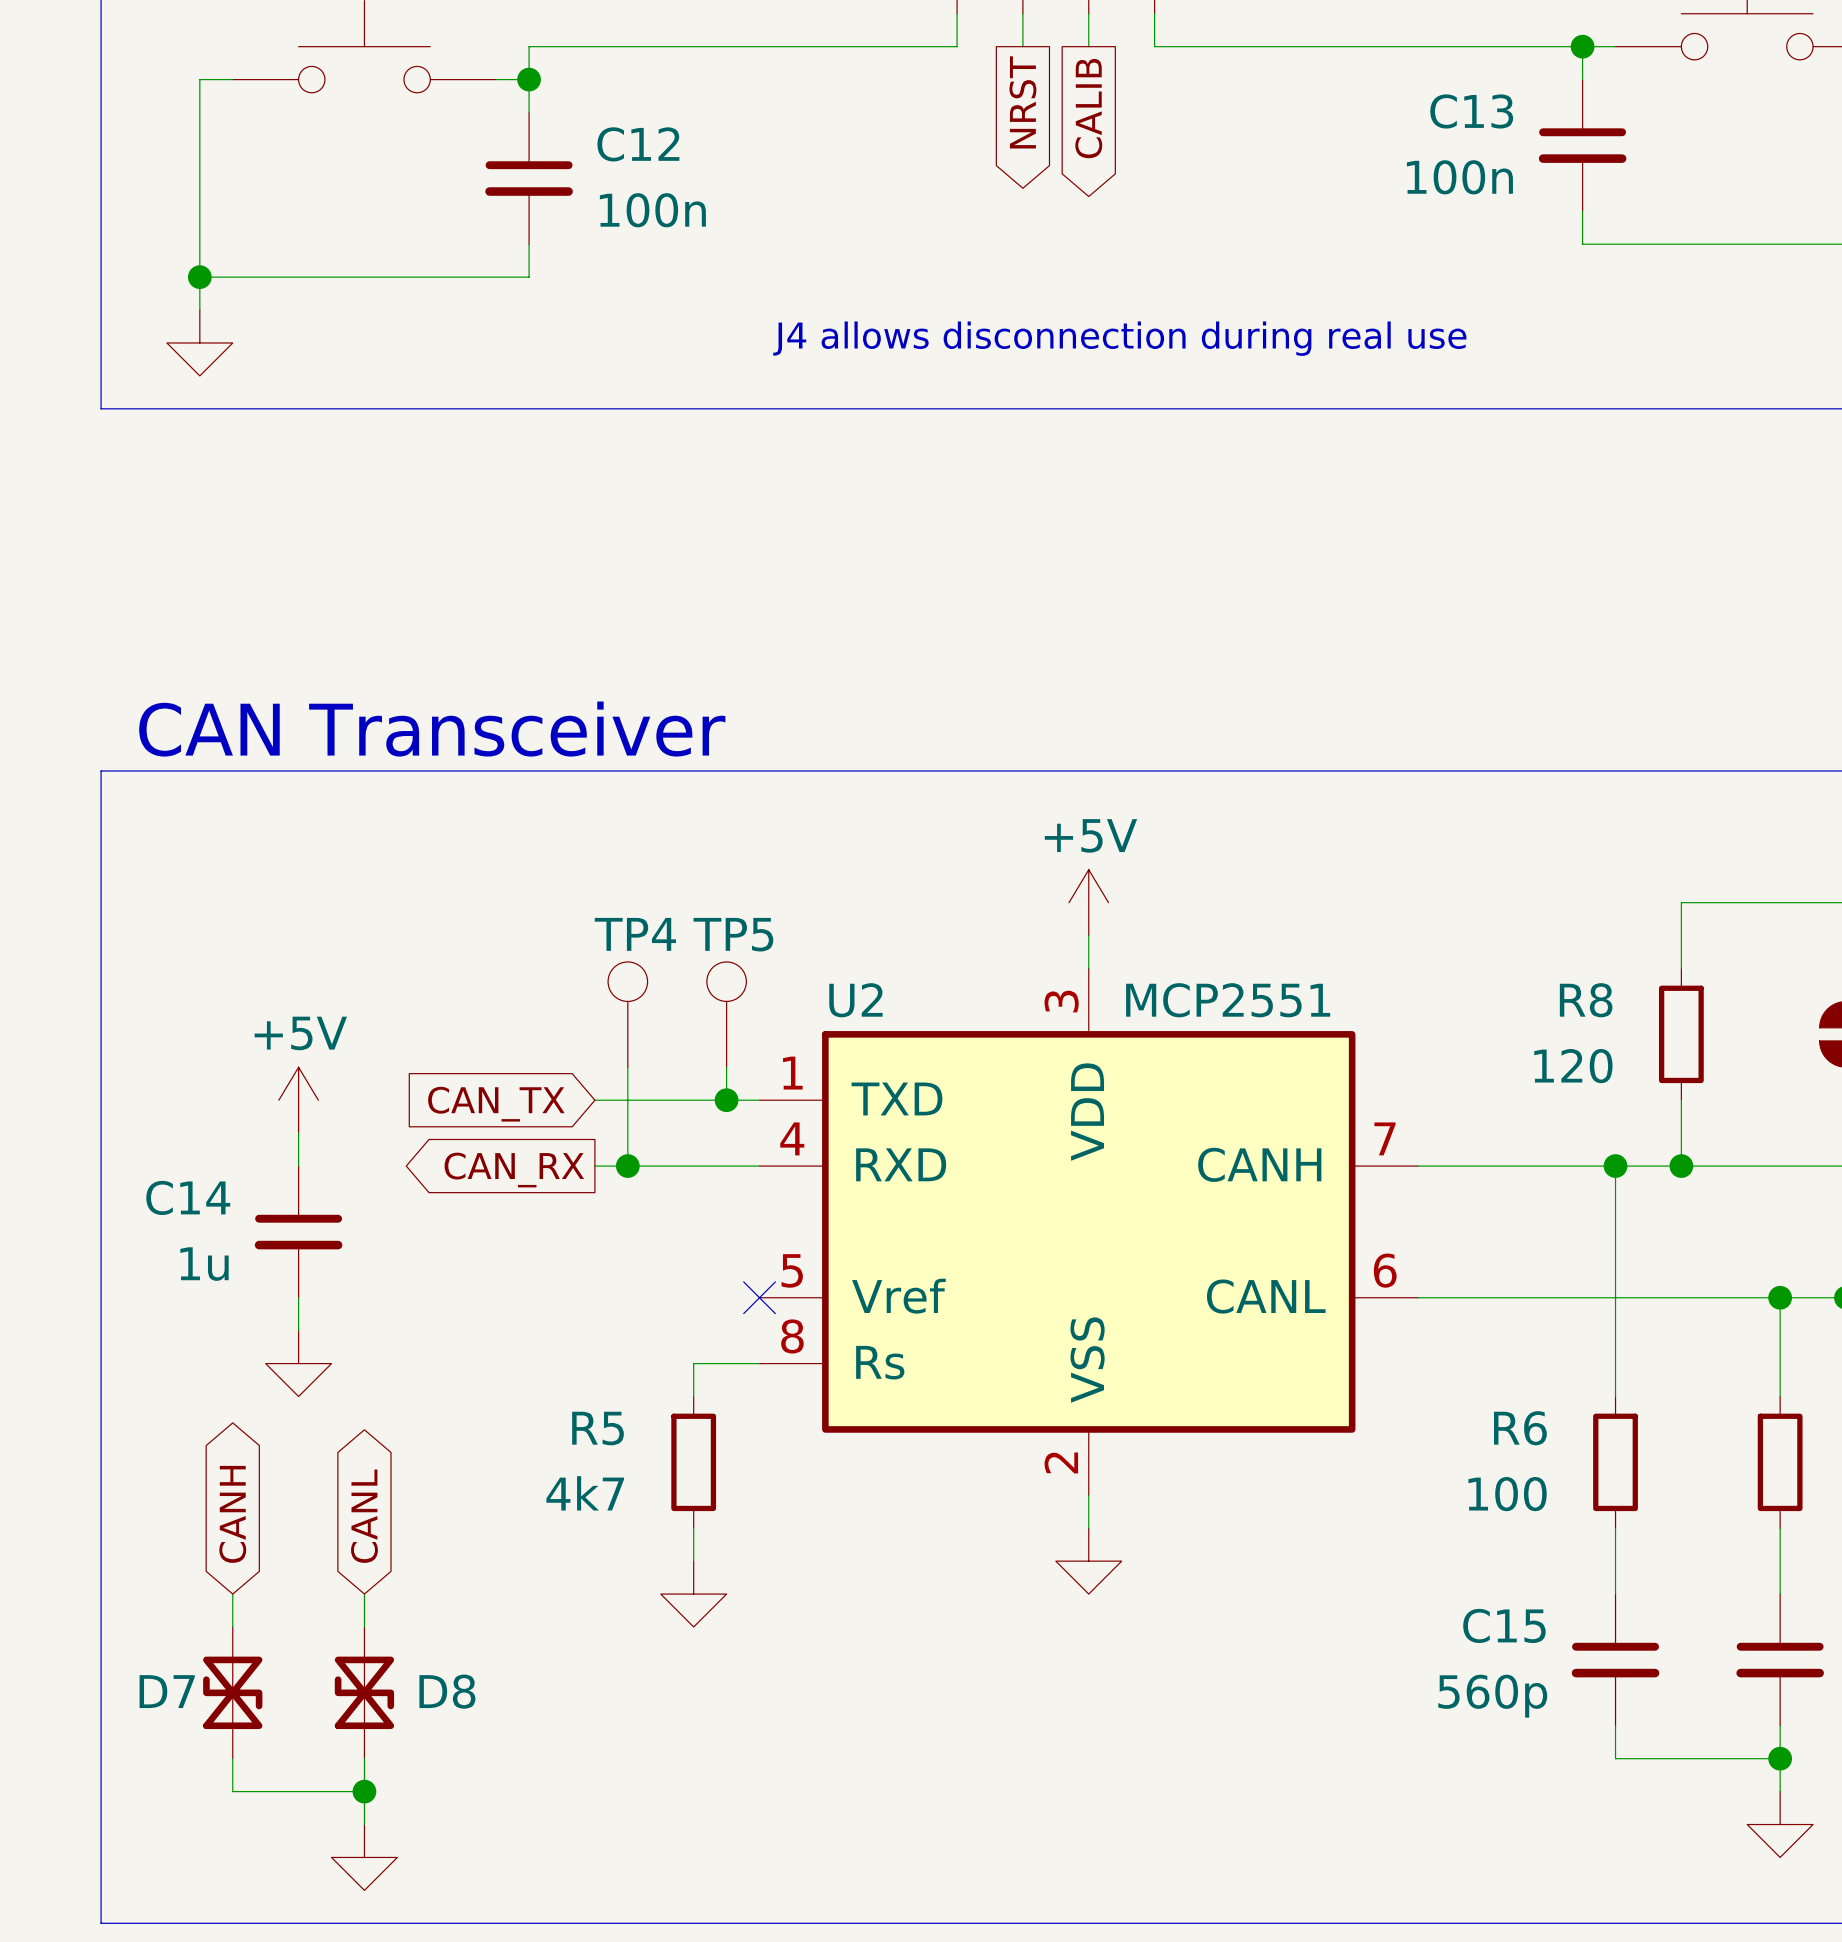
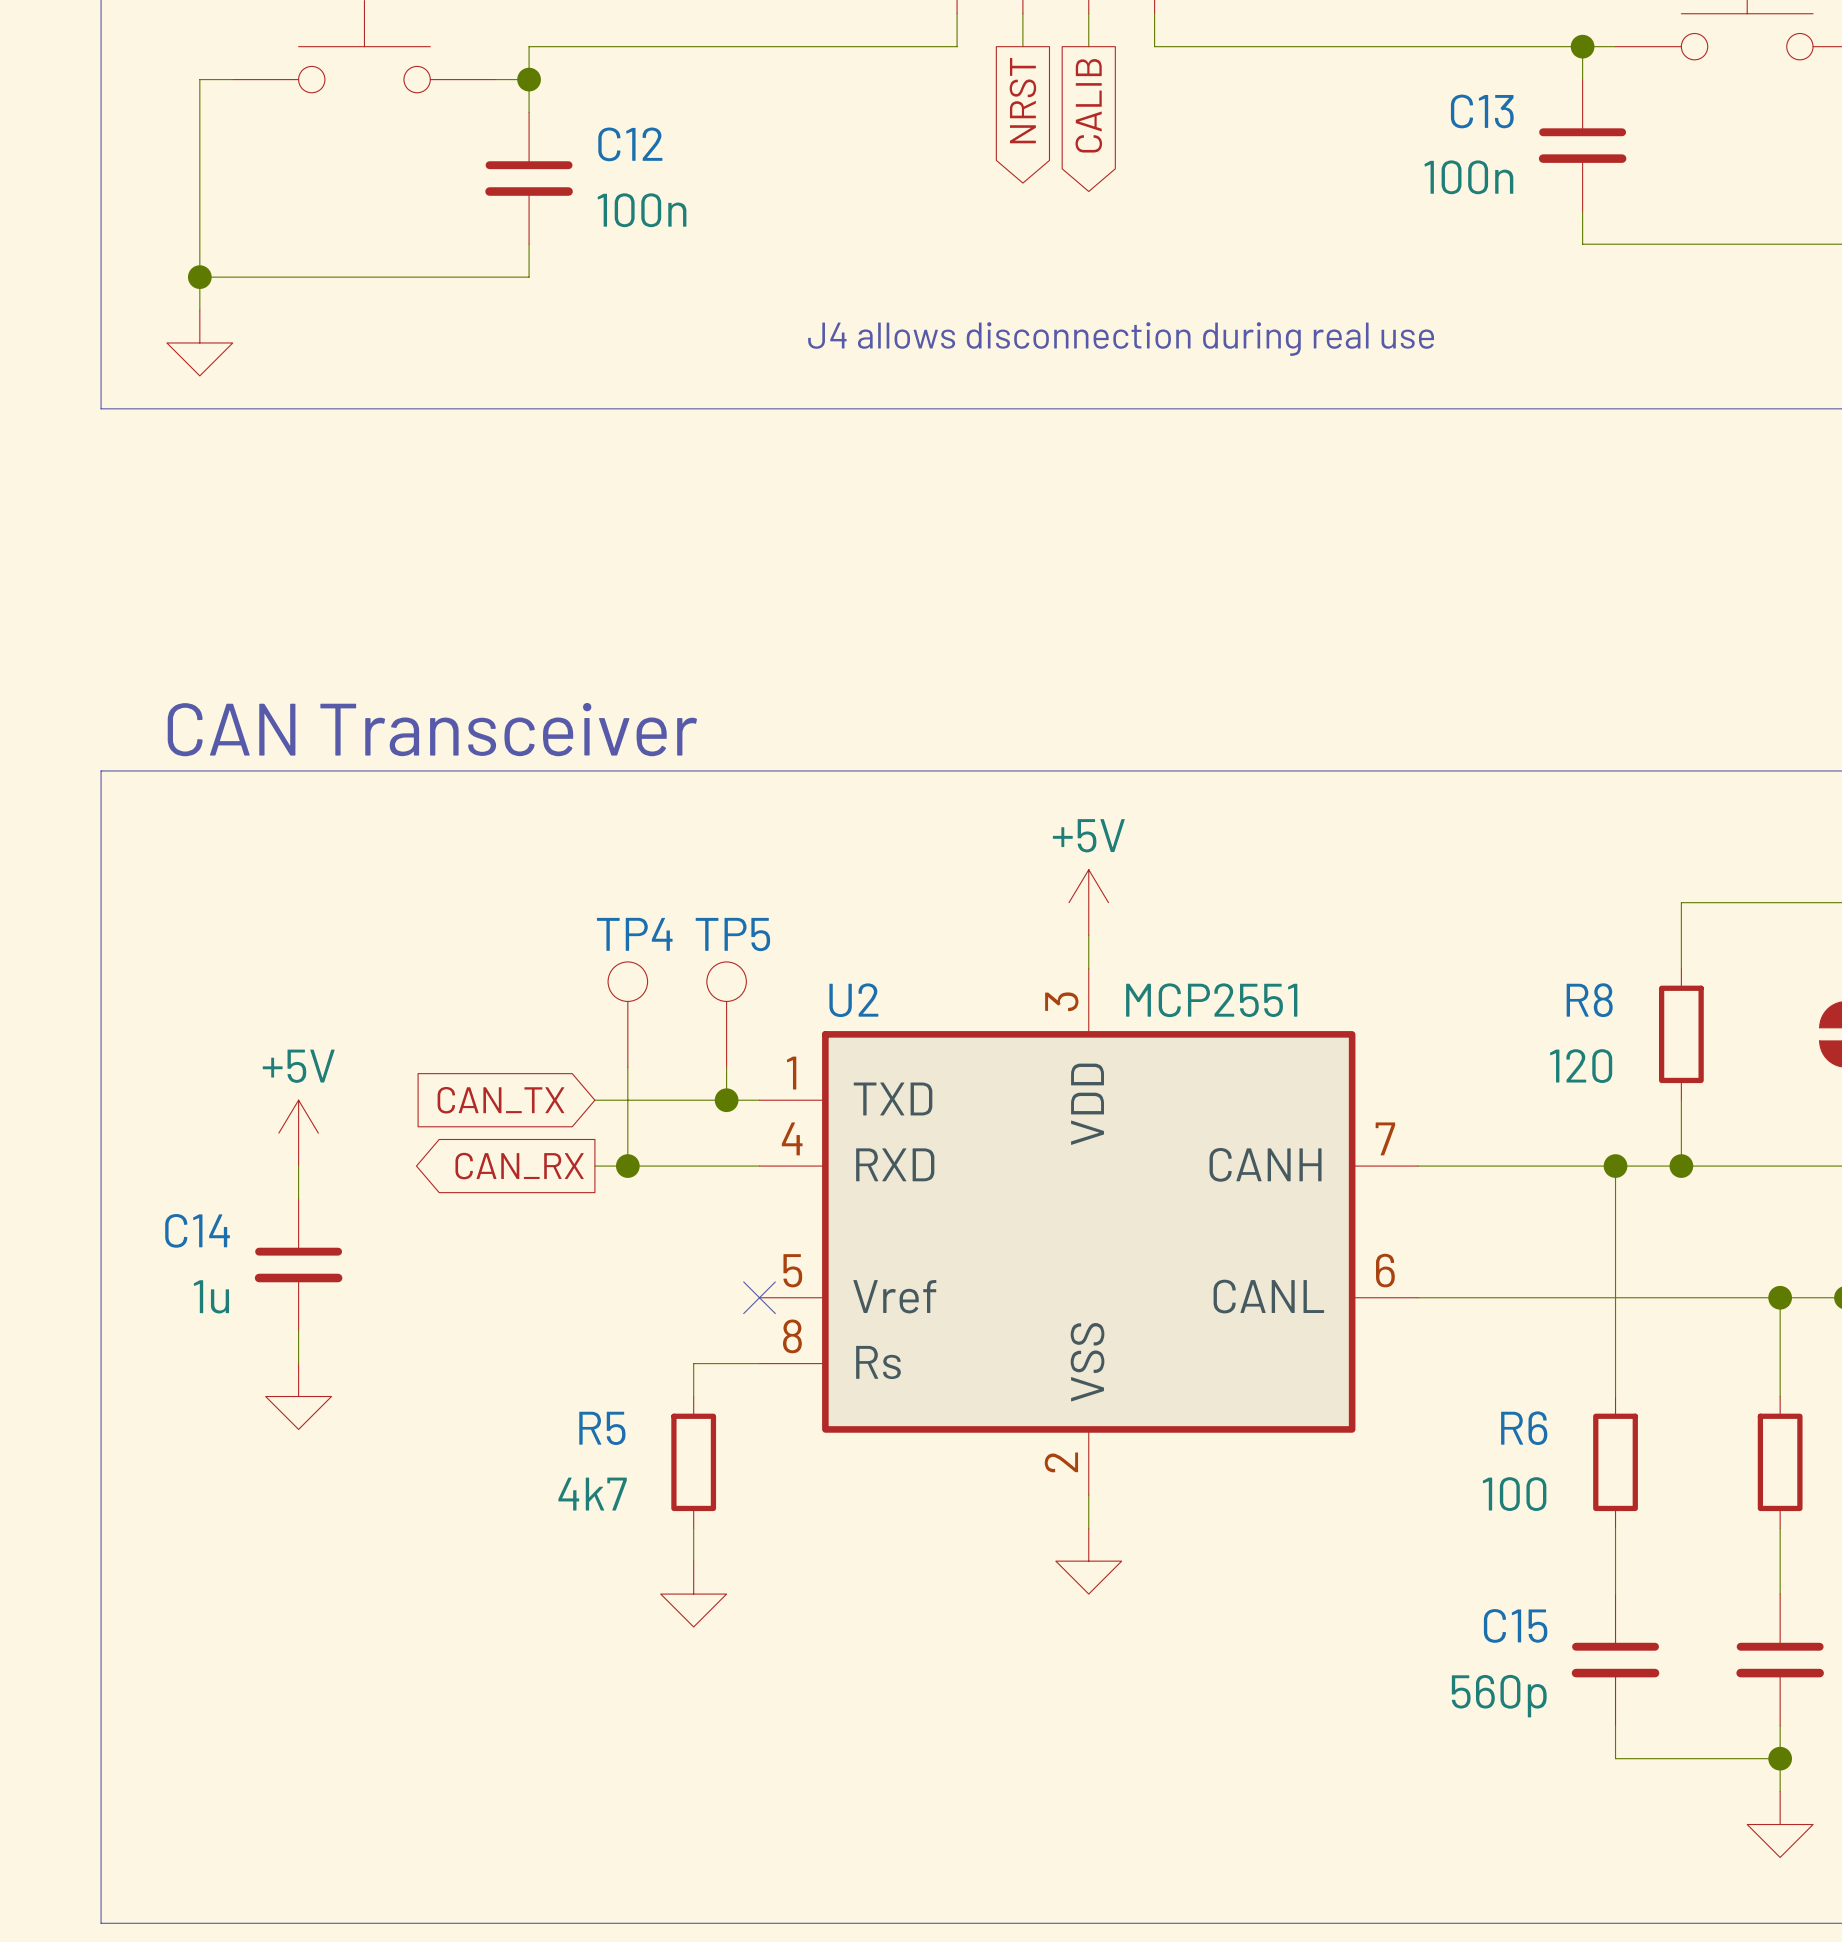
power symbol position: +5V (298, 1100) -> +5V (298, 1133)
C14 position: (298, 1231) -> (298, 1264)
power symbol position: (298, 1363) -> (298, 1396)
global label: CANH (232, 1514) -> none
global label: CANL (364, 1516) -> none
wire: (232, 1594) (232, 1626) -> none
wire: (364, 1594) (364, 1626) -> none
D7: (232, 1692) -> none
D8: (364, 1692) -> none
wire: (232, 1758) (232, 1791) (364, 1791) -> none
wire: (364, 1758) (364, 1824) -> none
junction: (364, 1791) -> none
power symbol: (364, 1857) -> none

